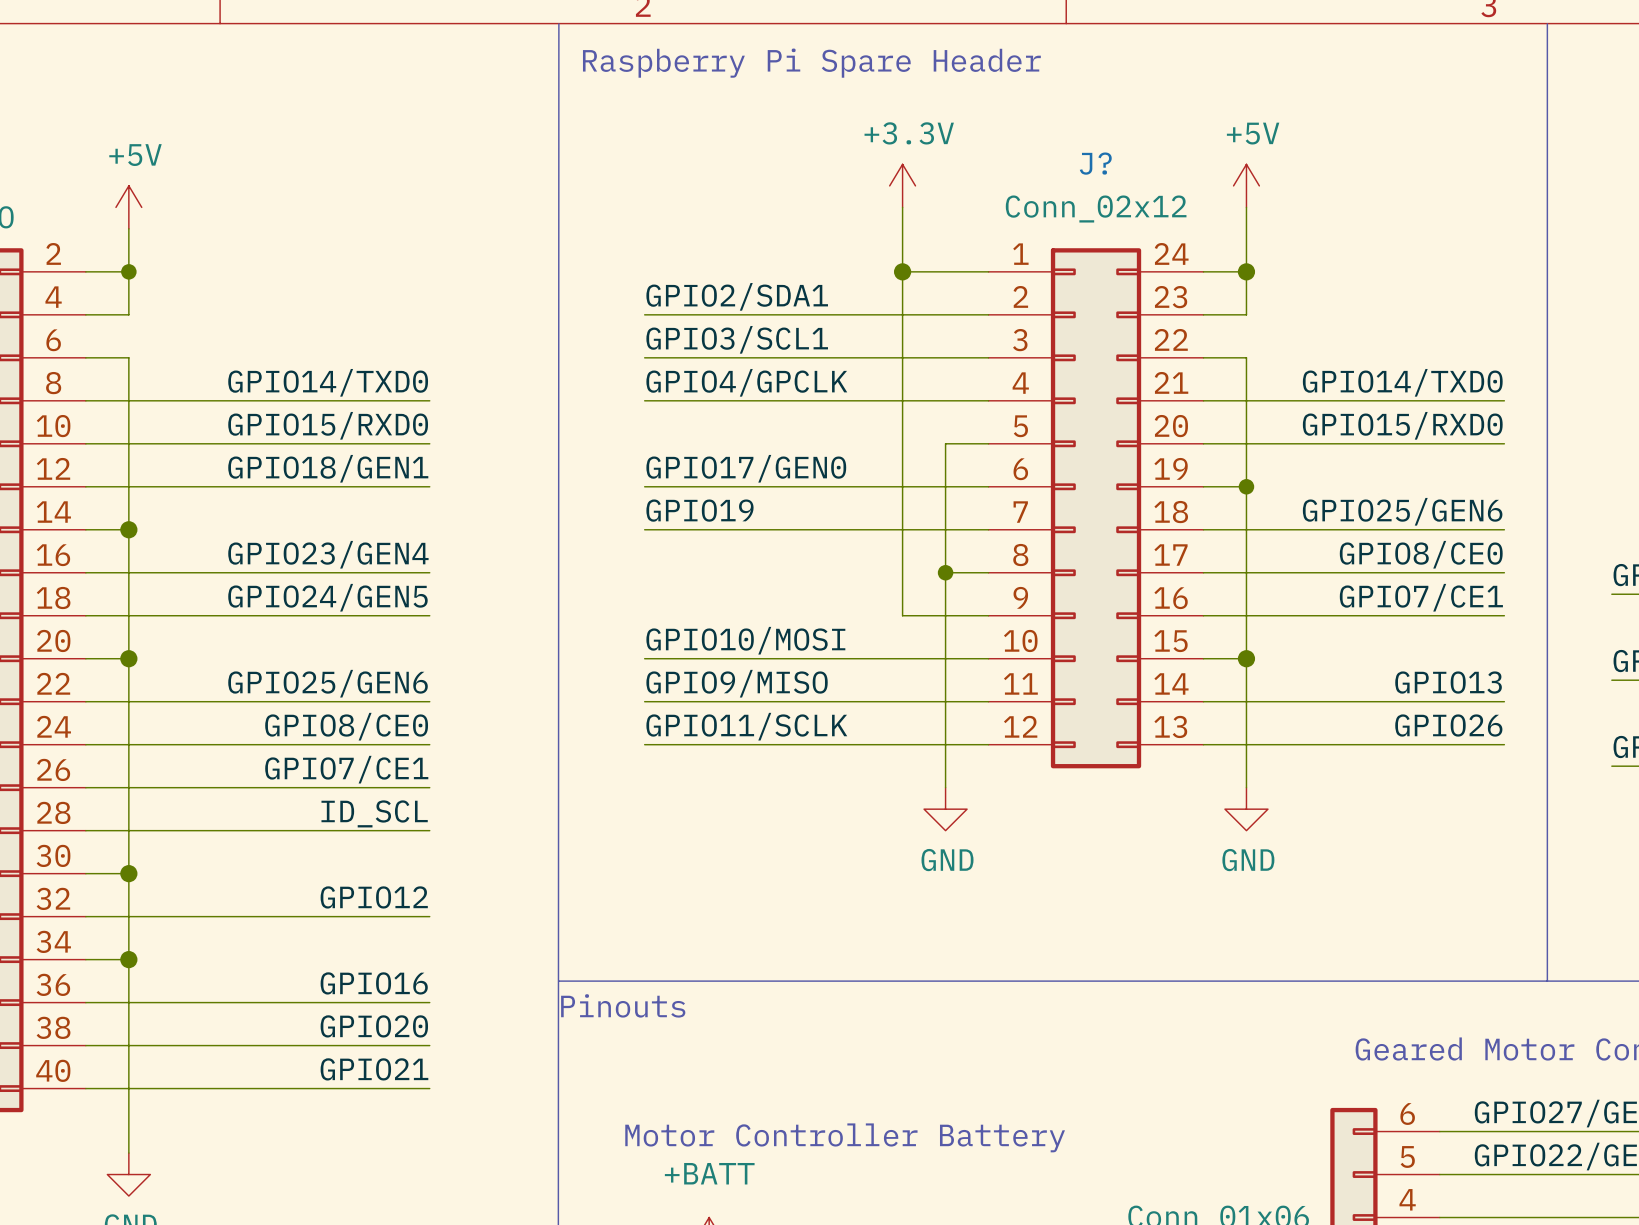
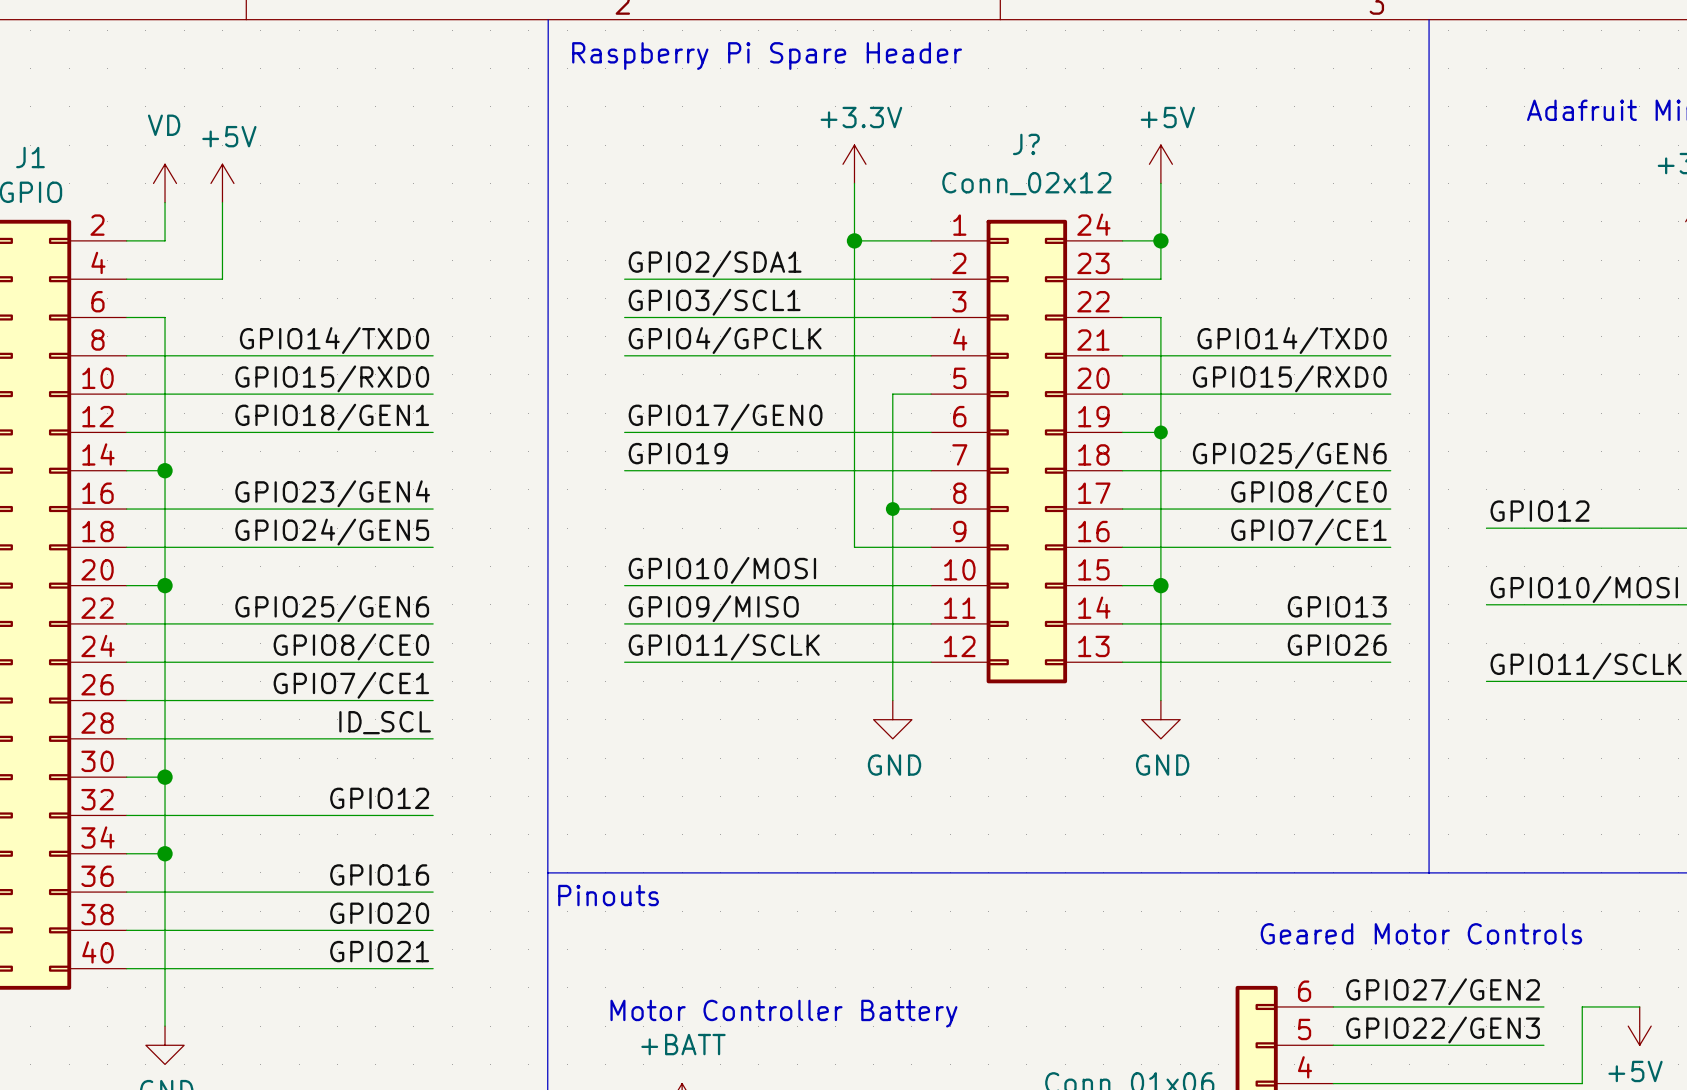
power symbol: +5V (128, 207) -> VD (165, 183)
power symbol: none -> +5V (222, 183)
wire: (128, 271) (128, 314) -> (222, 202) (222, 279) (165, 279)
junction: (128, 271) -> none

